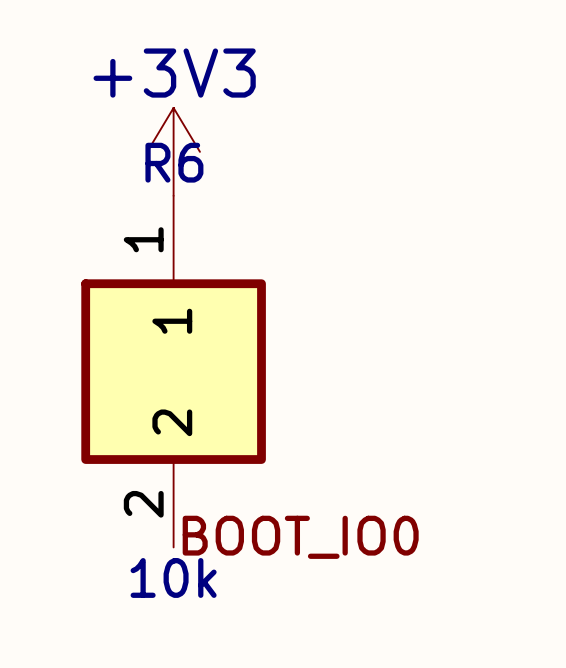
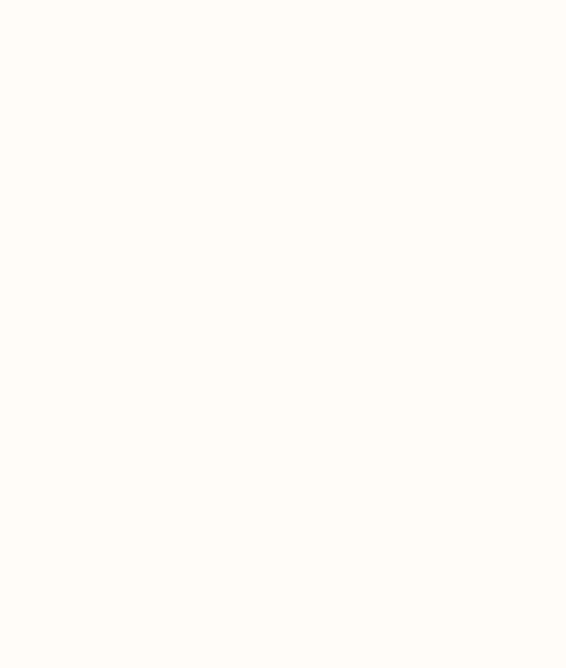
power symbol: +3V3 (173, 151) -> none
R6: 10k (173, 371) -> none
label: BOOT_IO0 (300, 537) -> none

